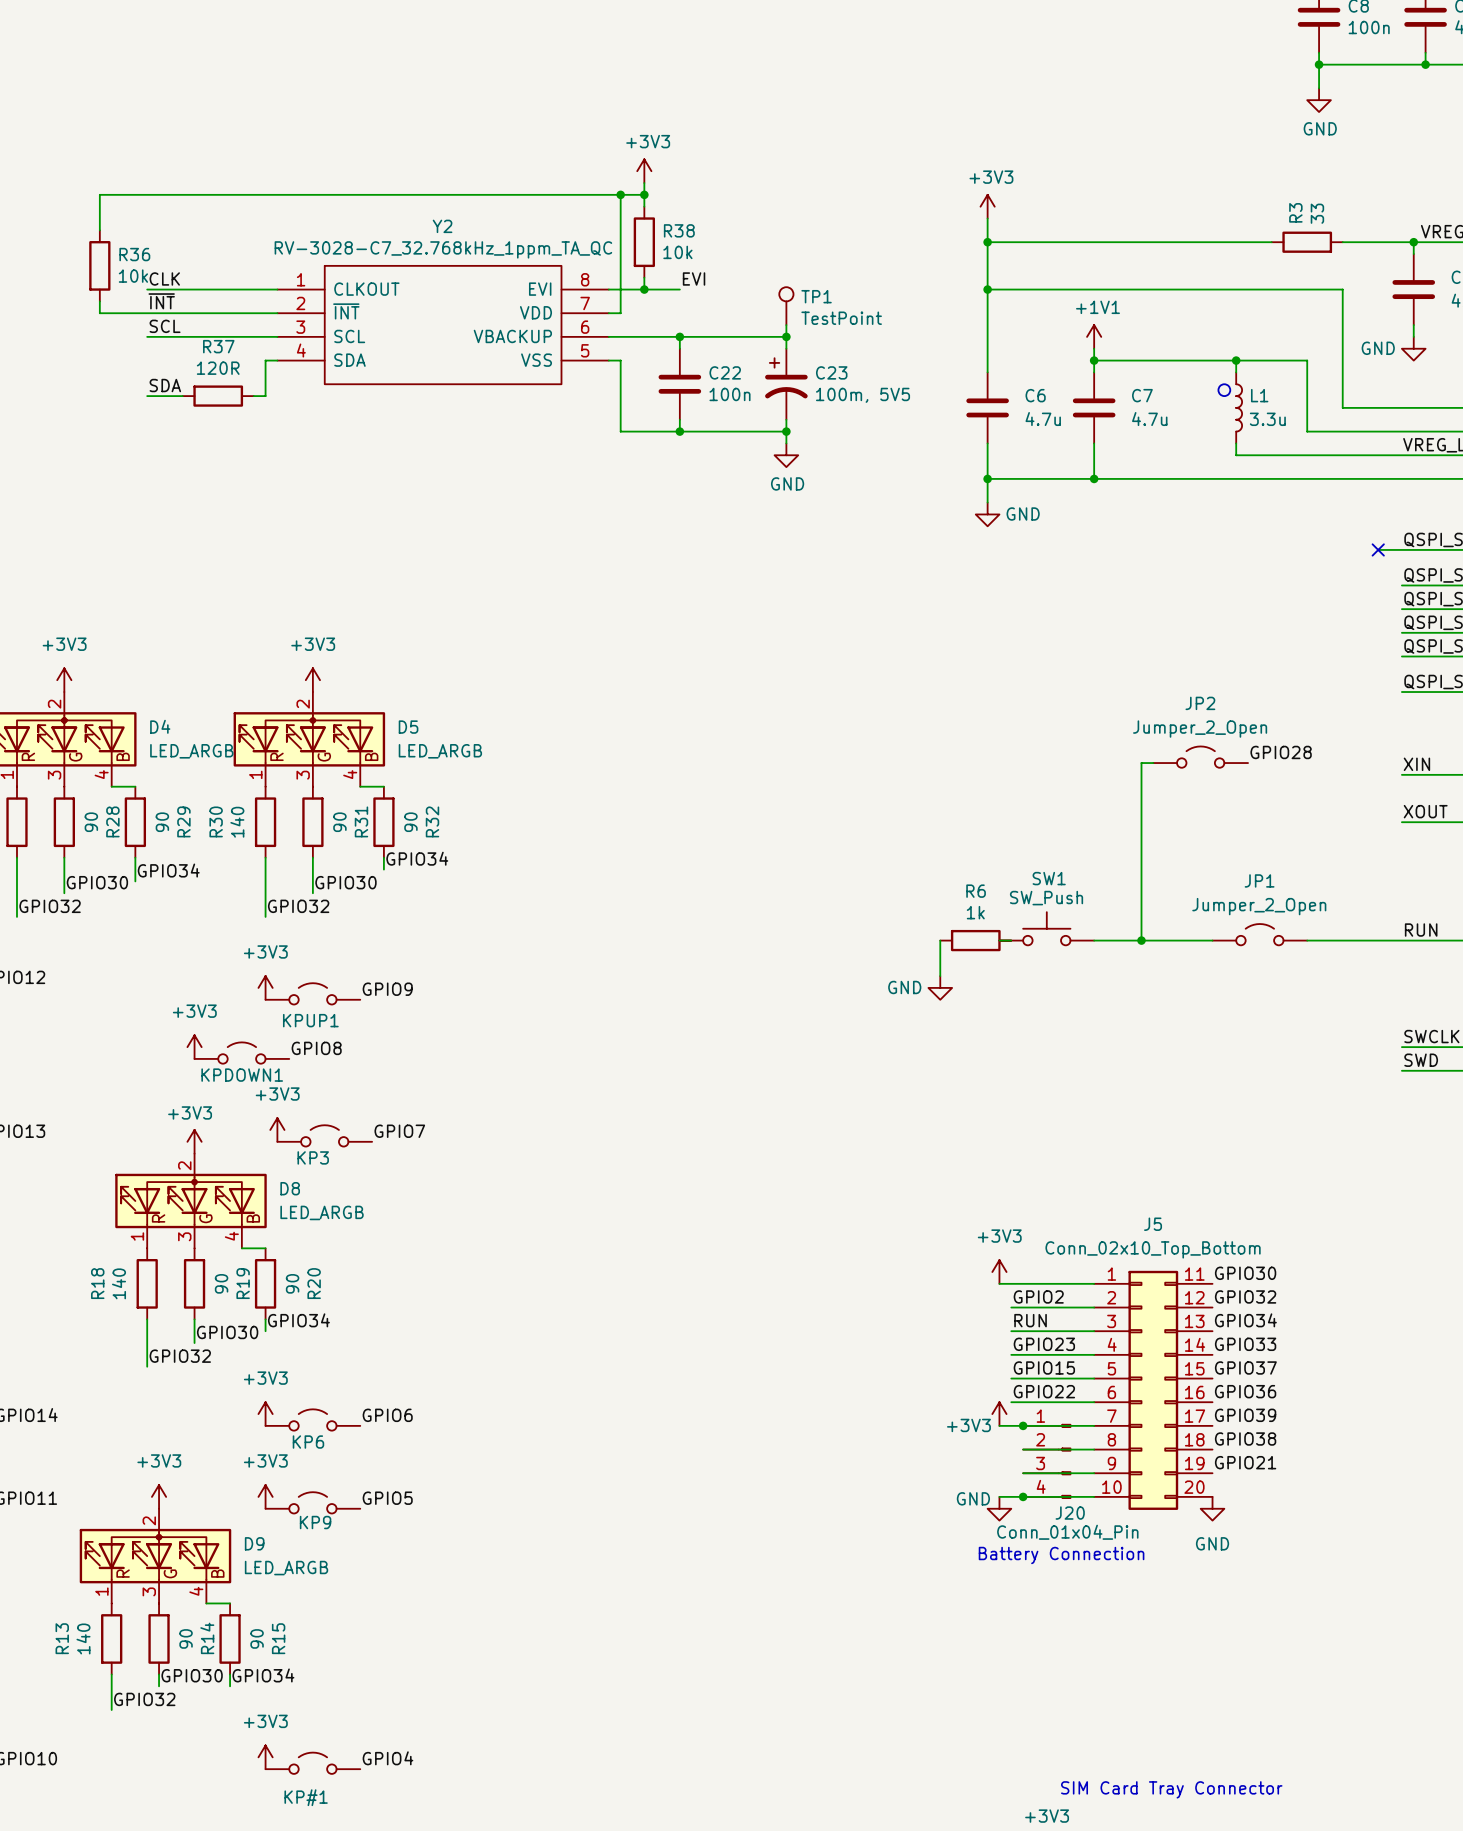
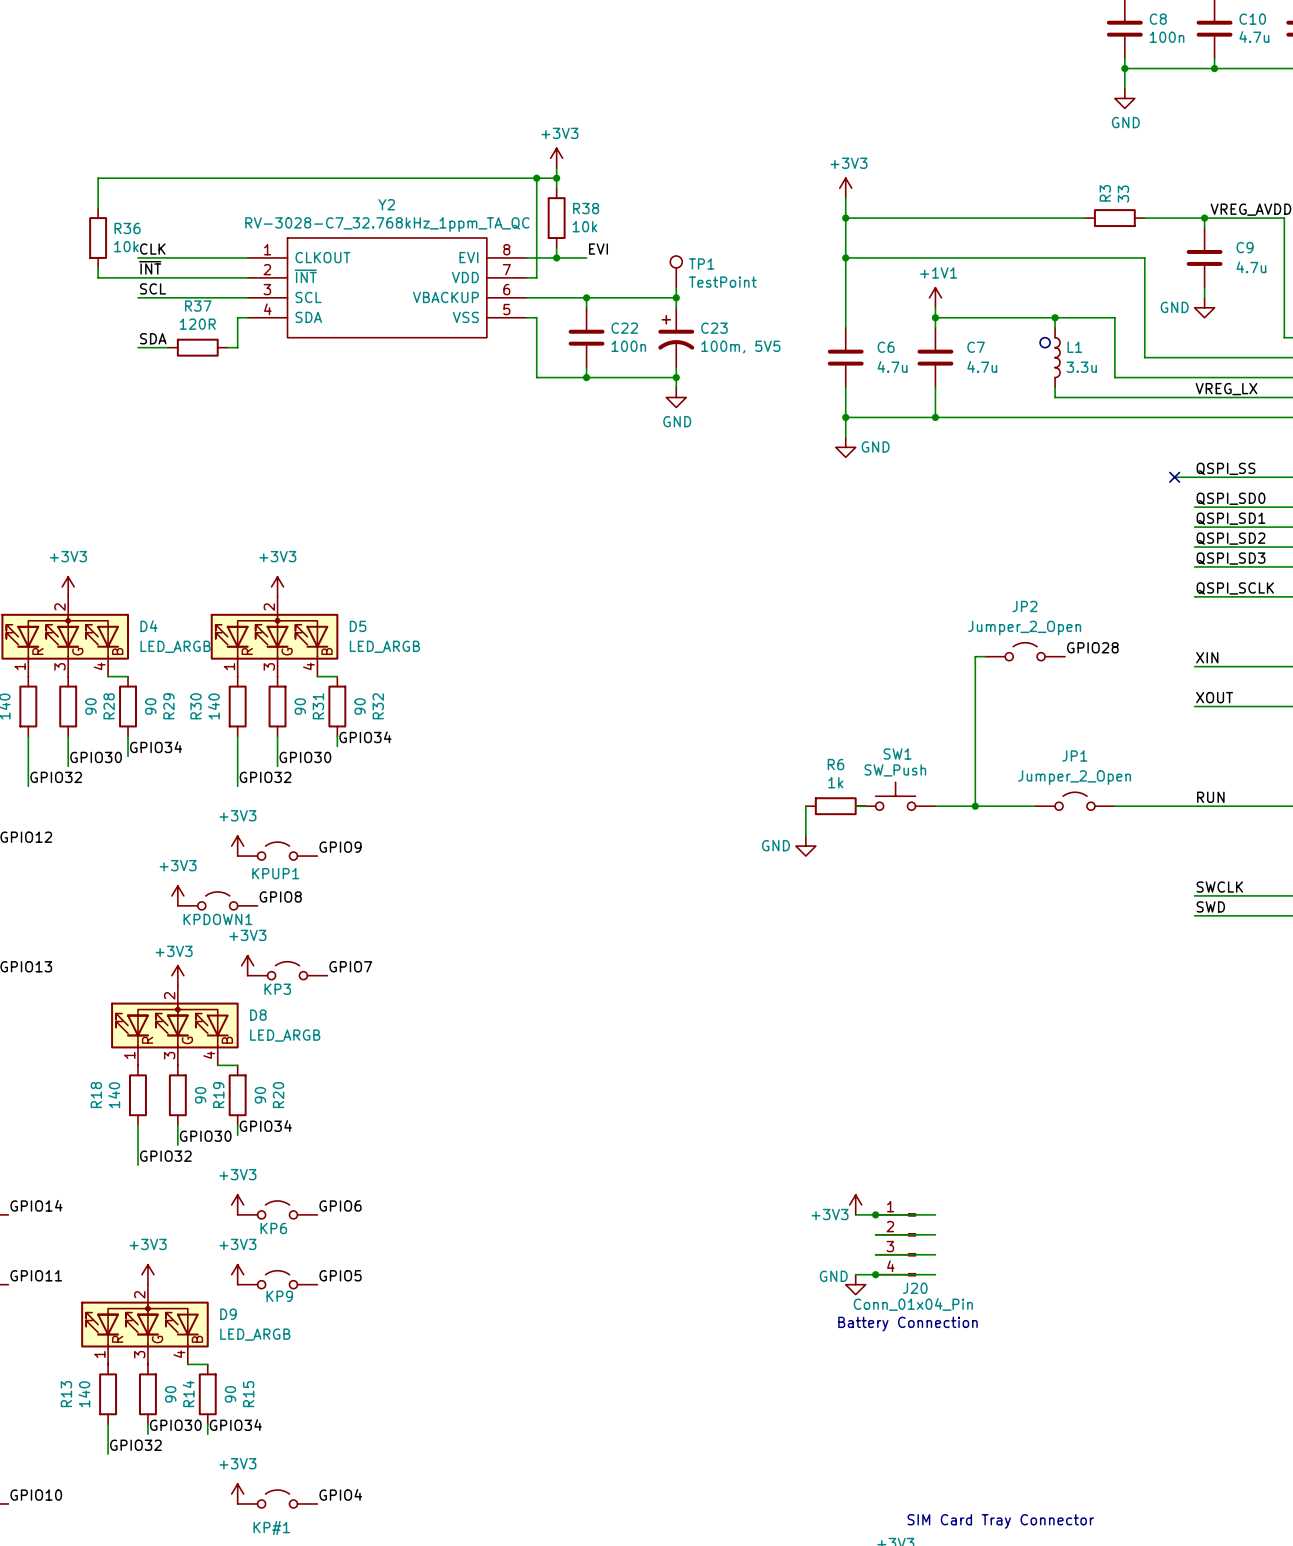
power symbol: +3V3 (999, 1272) -> none
label: GPIO30 (1245, 1273) -> none
wire: (999, 1283) (1094, 1283) -> none
label: GPIO2 (1038, 1296) -> none
label: GPIO32 (1245, 1296) -> none
wire: (1011, 1307) (1094, 1307) -> none
label: RUN (1030, 1320) -> none
label: GPIO34 (1245, 1320) -> none
wire: (1011, 1331) (1094, 1331) -> none
label: GPIO23 (1044, 1344) -> none
label: GPIO33 (1245, 1344) -> none
wire: (1011, 1354) (1094, 1354) -> none
label: GPIO15 (1044, 1367) -> none
label: GPIO37 (1245, 1367) -> none
wire: (1011, 1378) (1094, 1378) -> none
J5: Conn_02x10_Top_Bottom (1153, 1390) -> none
label: GPIO22 (1044, 1391) -> none
label: GPIO36 (1245, 1391) -> none
wire: (1011, 1402) (1094, 1402) -> none
label: GPIO39 (1245, 1415) -> none
label: GPIO38 (1245, 1439) -> none
label: GPIO21 (1245, 1462) -> none
power symbol: GND (1212, 1508) -> none

